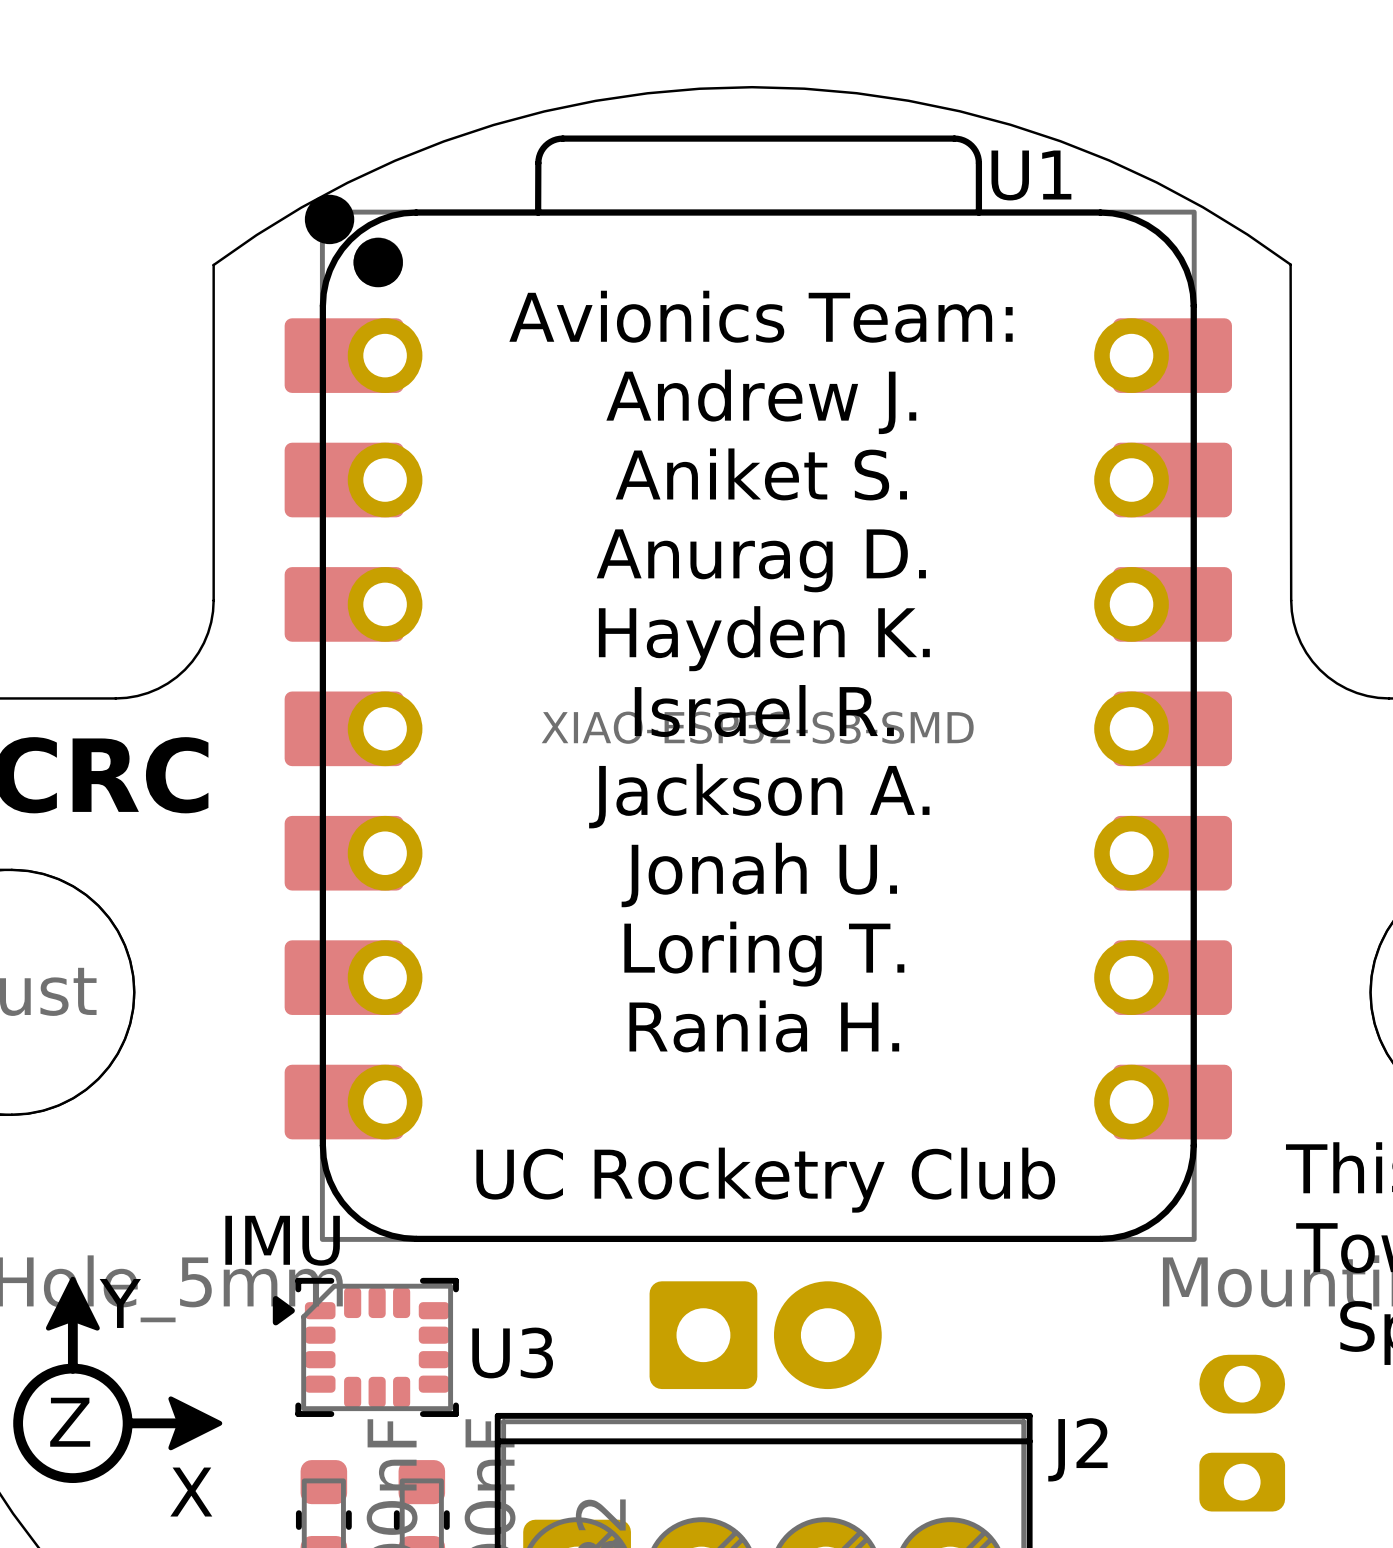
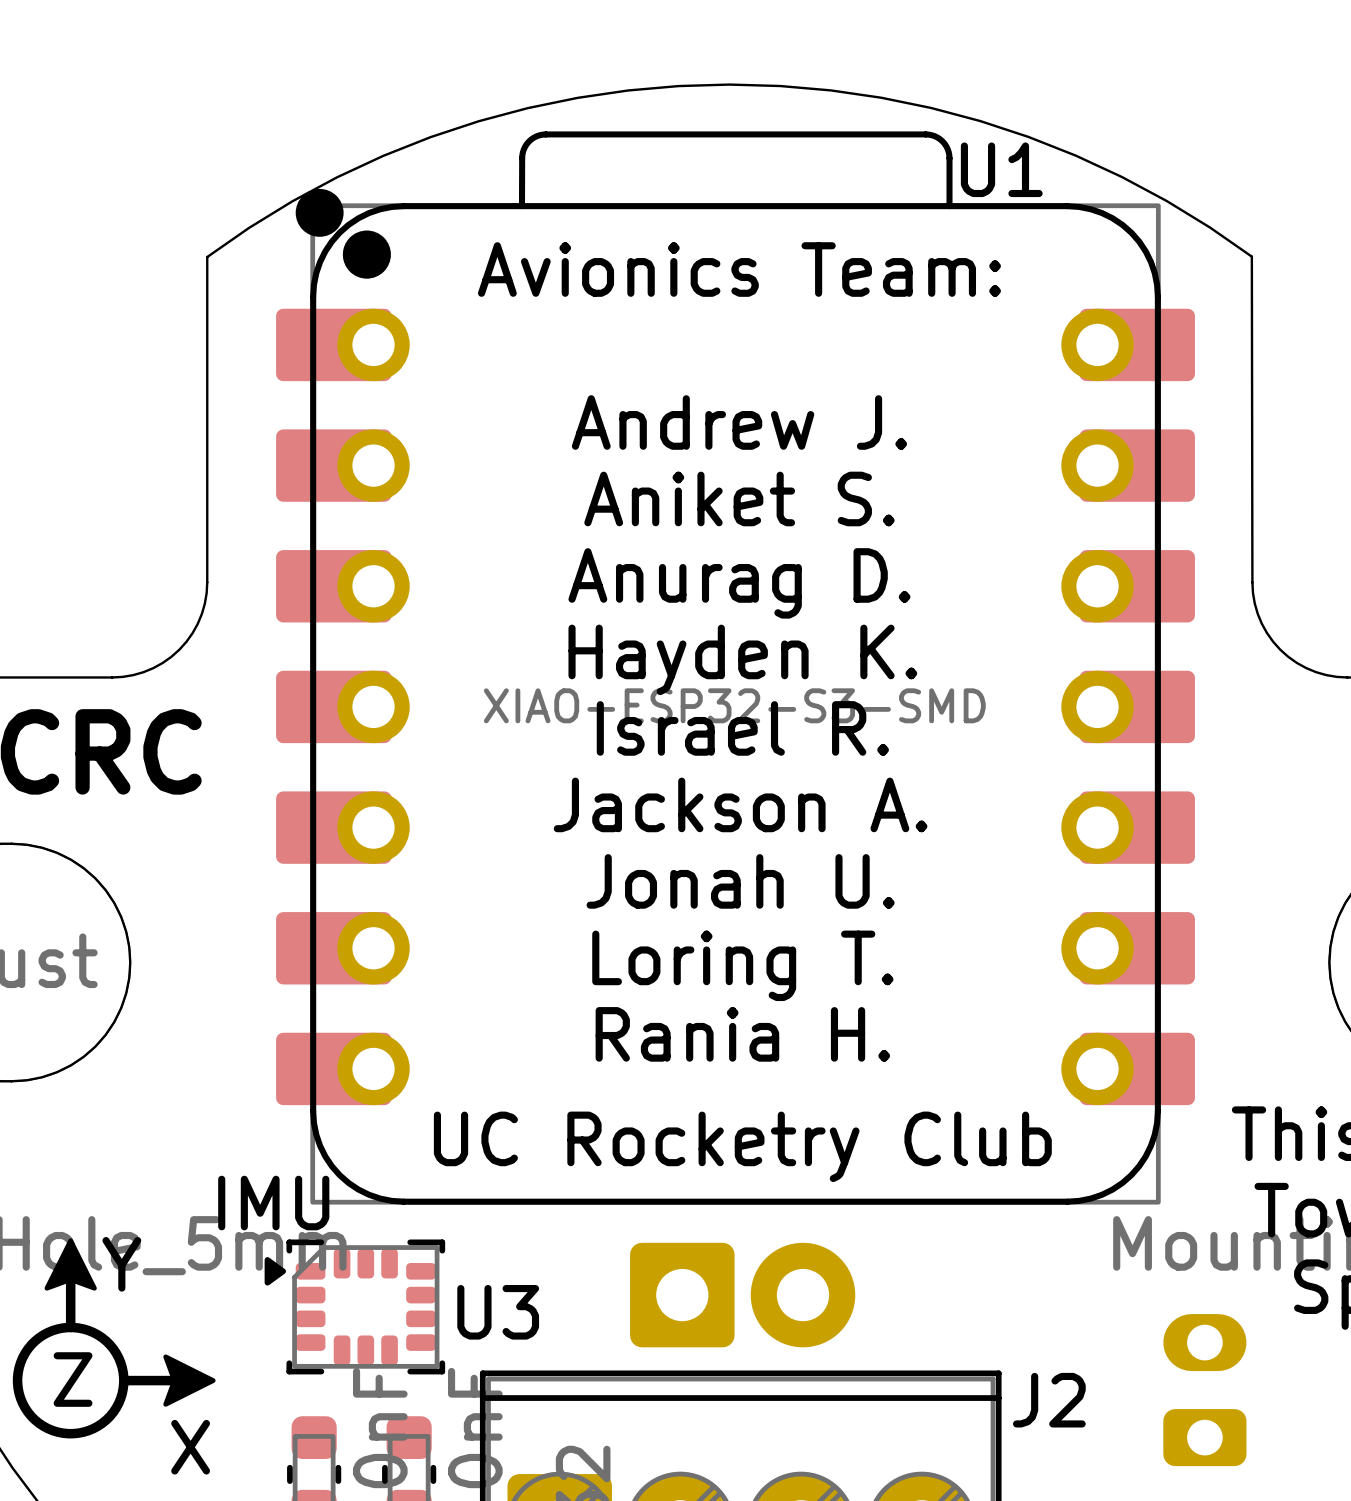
text position: Avionics Team: (761, 316) -> Avionics Team: (739, 269)
text position: Andrew J. (761, 401) -> Andrew J. (739, 422)
text position: Aniket S. (761, 474) -> Aniket S. (739, 498)
text position: Anurag D. (761, 560) -> Anurag D. (739, 583)
text position: Hayden K. (764, 638) -> Hayden K. (742, 659)
text position: Israel R. (764, 711) -> Israel R. (742, 728)
text position: Jackson A. (759, 796) -> Jackson A. (740, 804)
text position: Jonah U. (759, 874) -> Jonah U. (740, 881)
text position: Loring T. (764, 954) -> Loring T. (742, 965)
text position: Rania H. (764, 1026) -> Rania H. (742, 1034)

